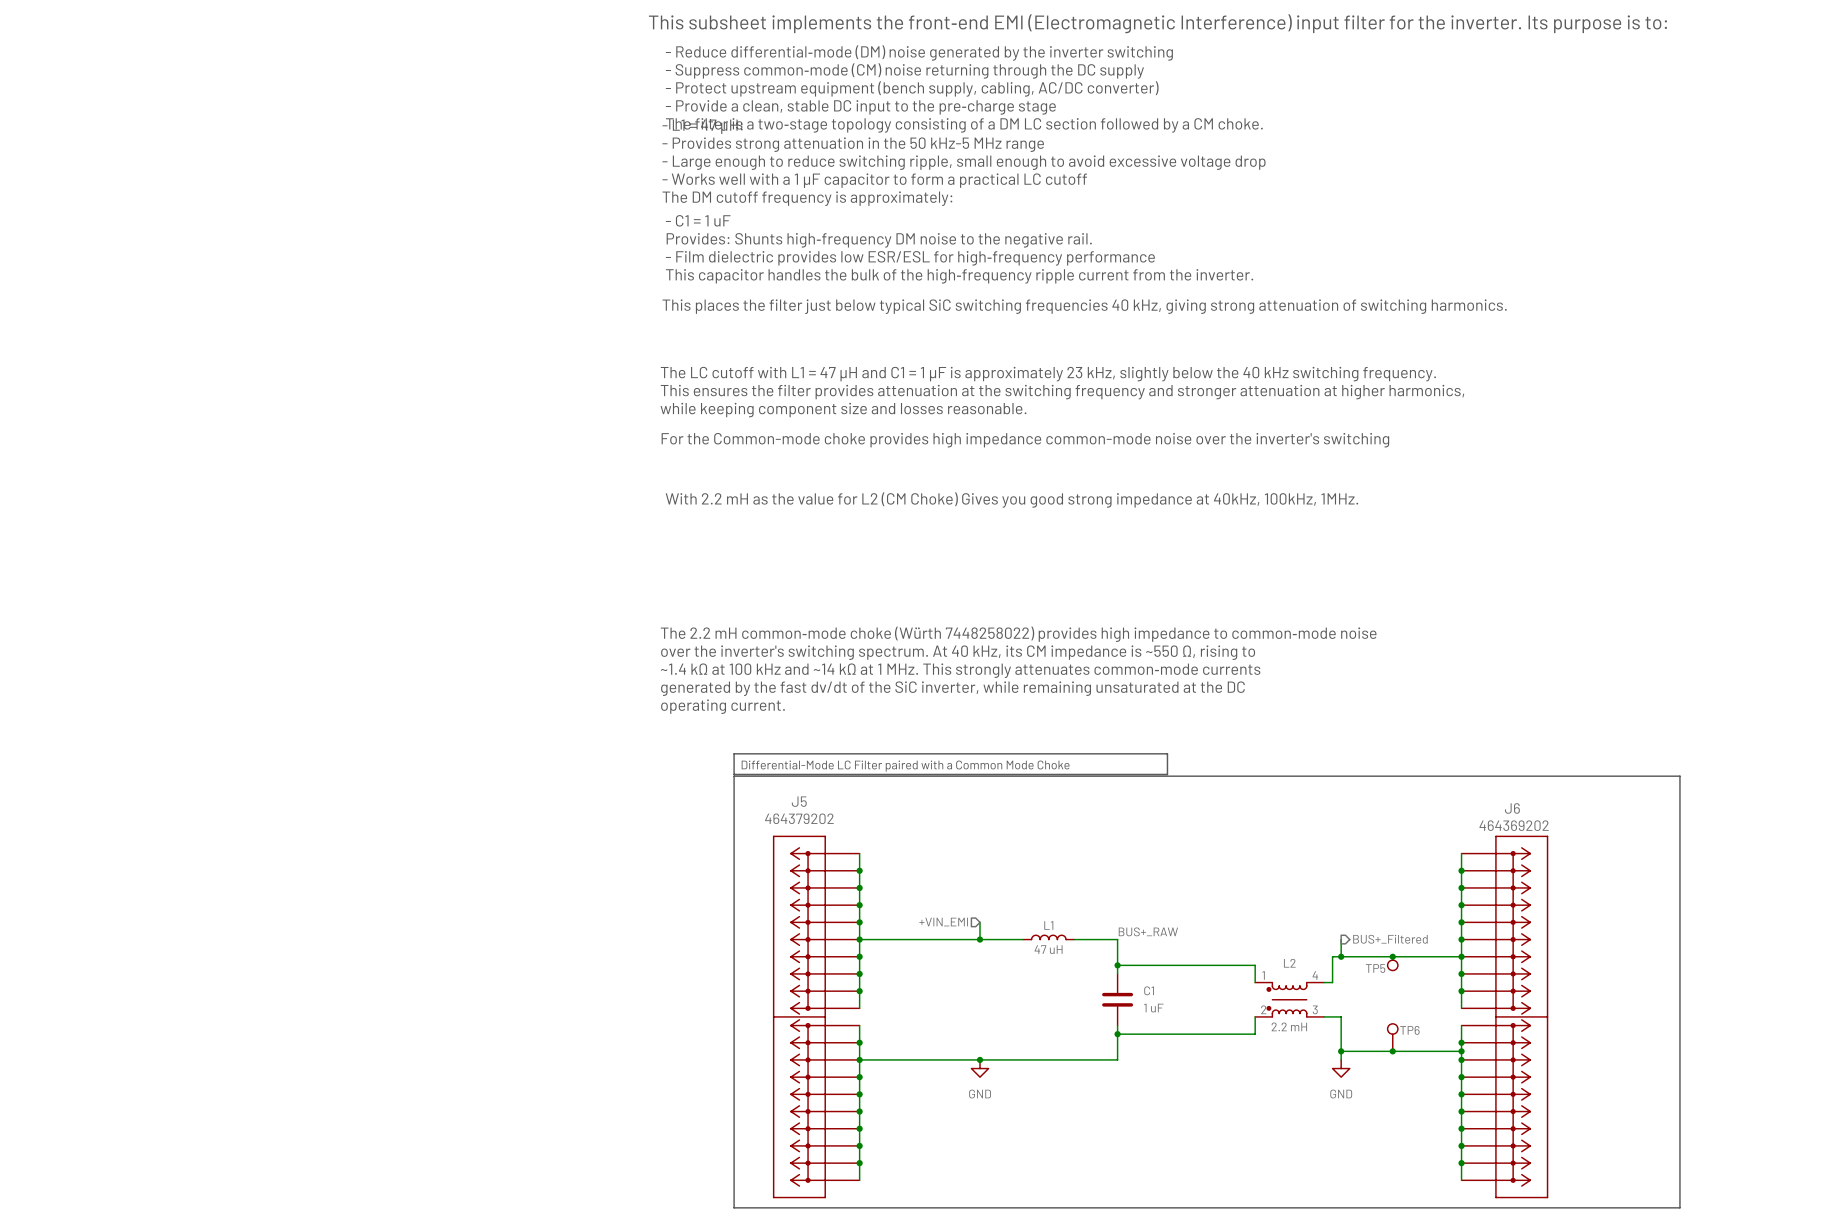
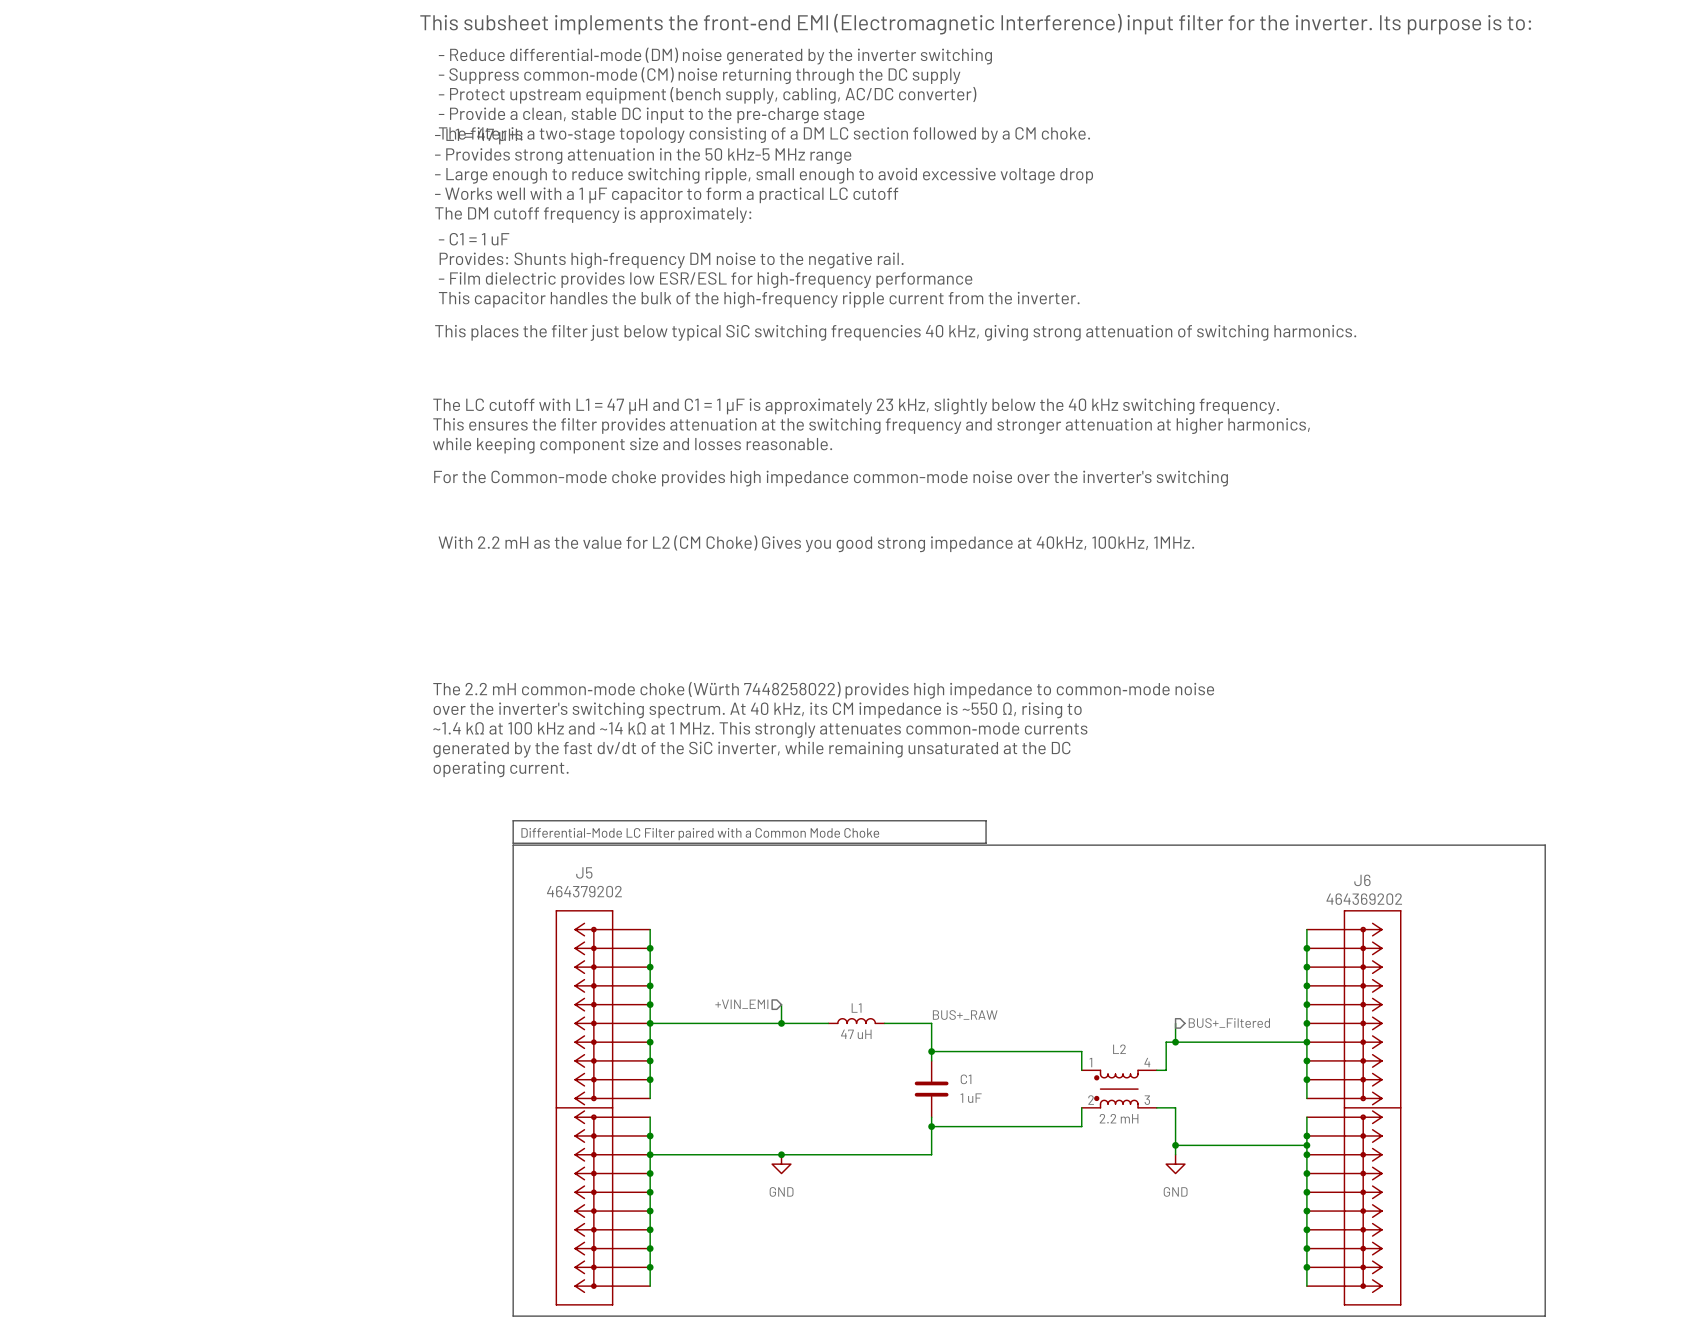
junction: (1392, 956) -> none
TP5: (1392, 963) -> none
TP6: (1392, 1037) -> none
junction: (1392, 1051) -> none

